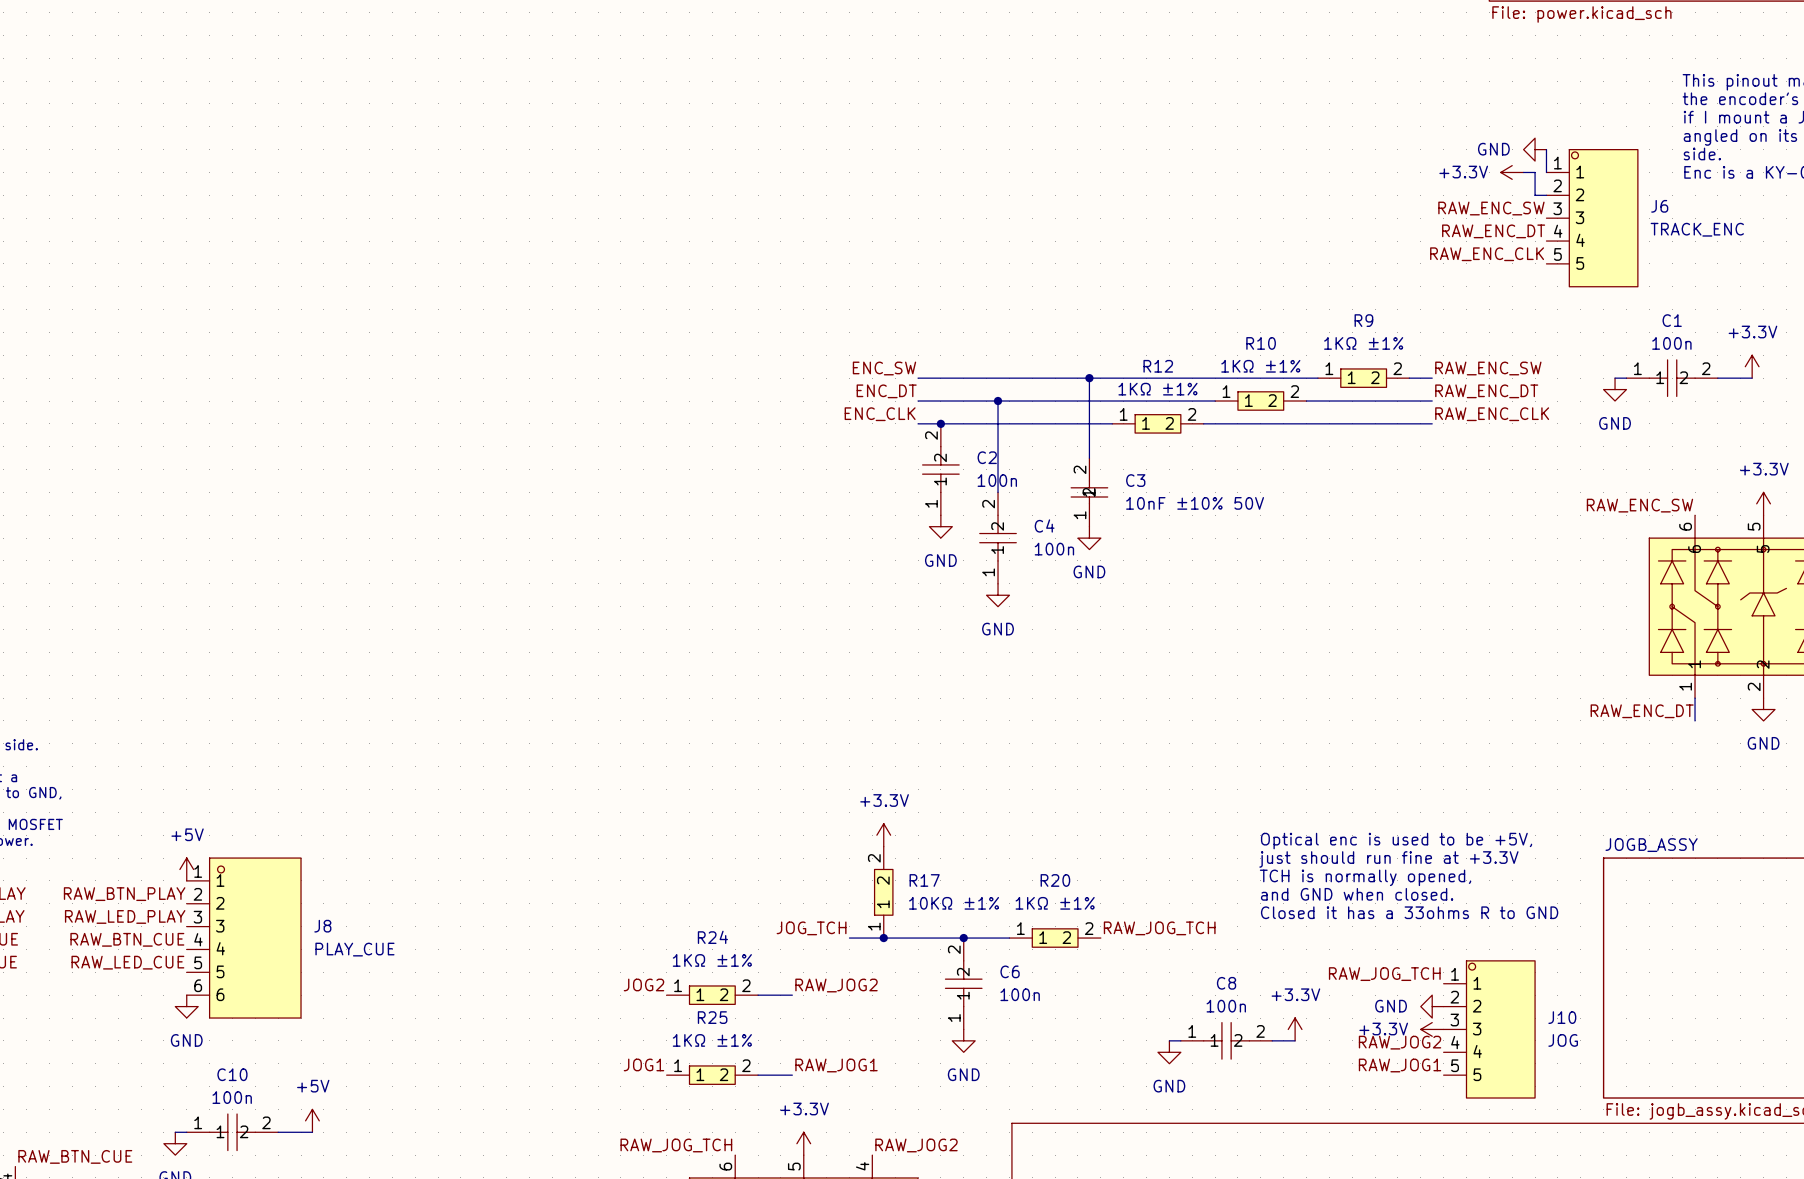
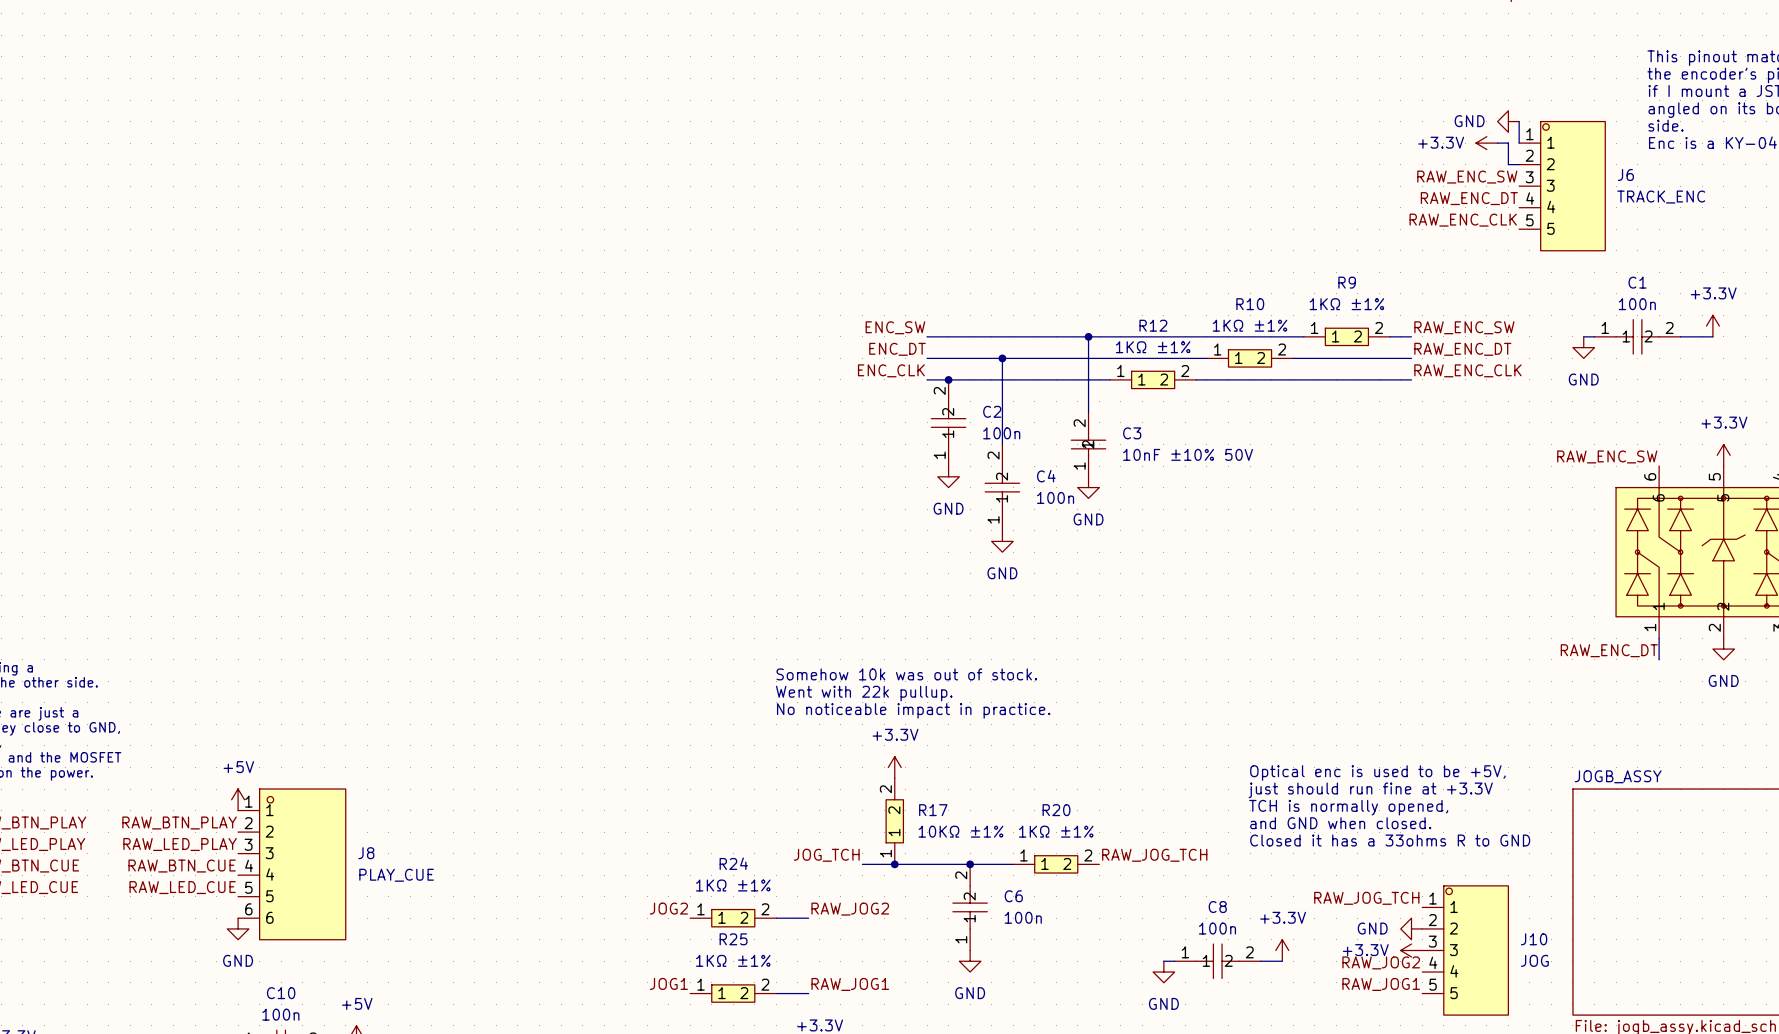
text: none -> Somehow 10k was out of stock. (906, 674)
text: none -> Went with 22k pullup. (864, 693)
text: none -> No noticeable impact in practice. (913, 710)

